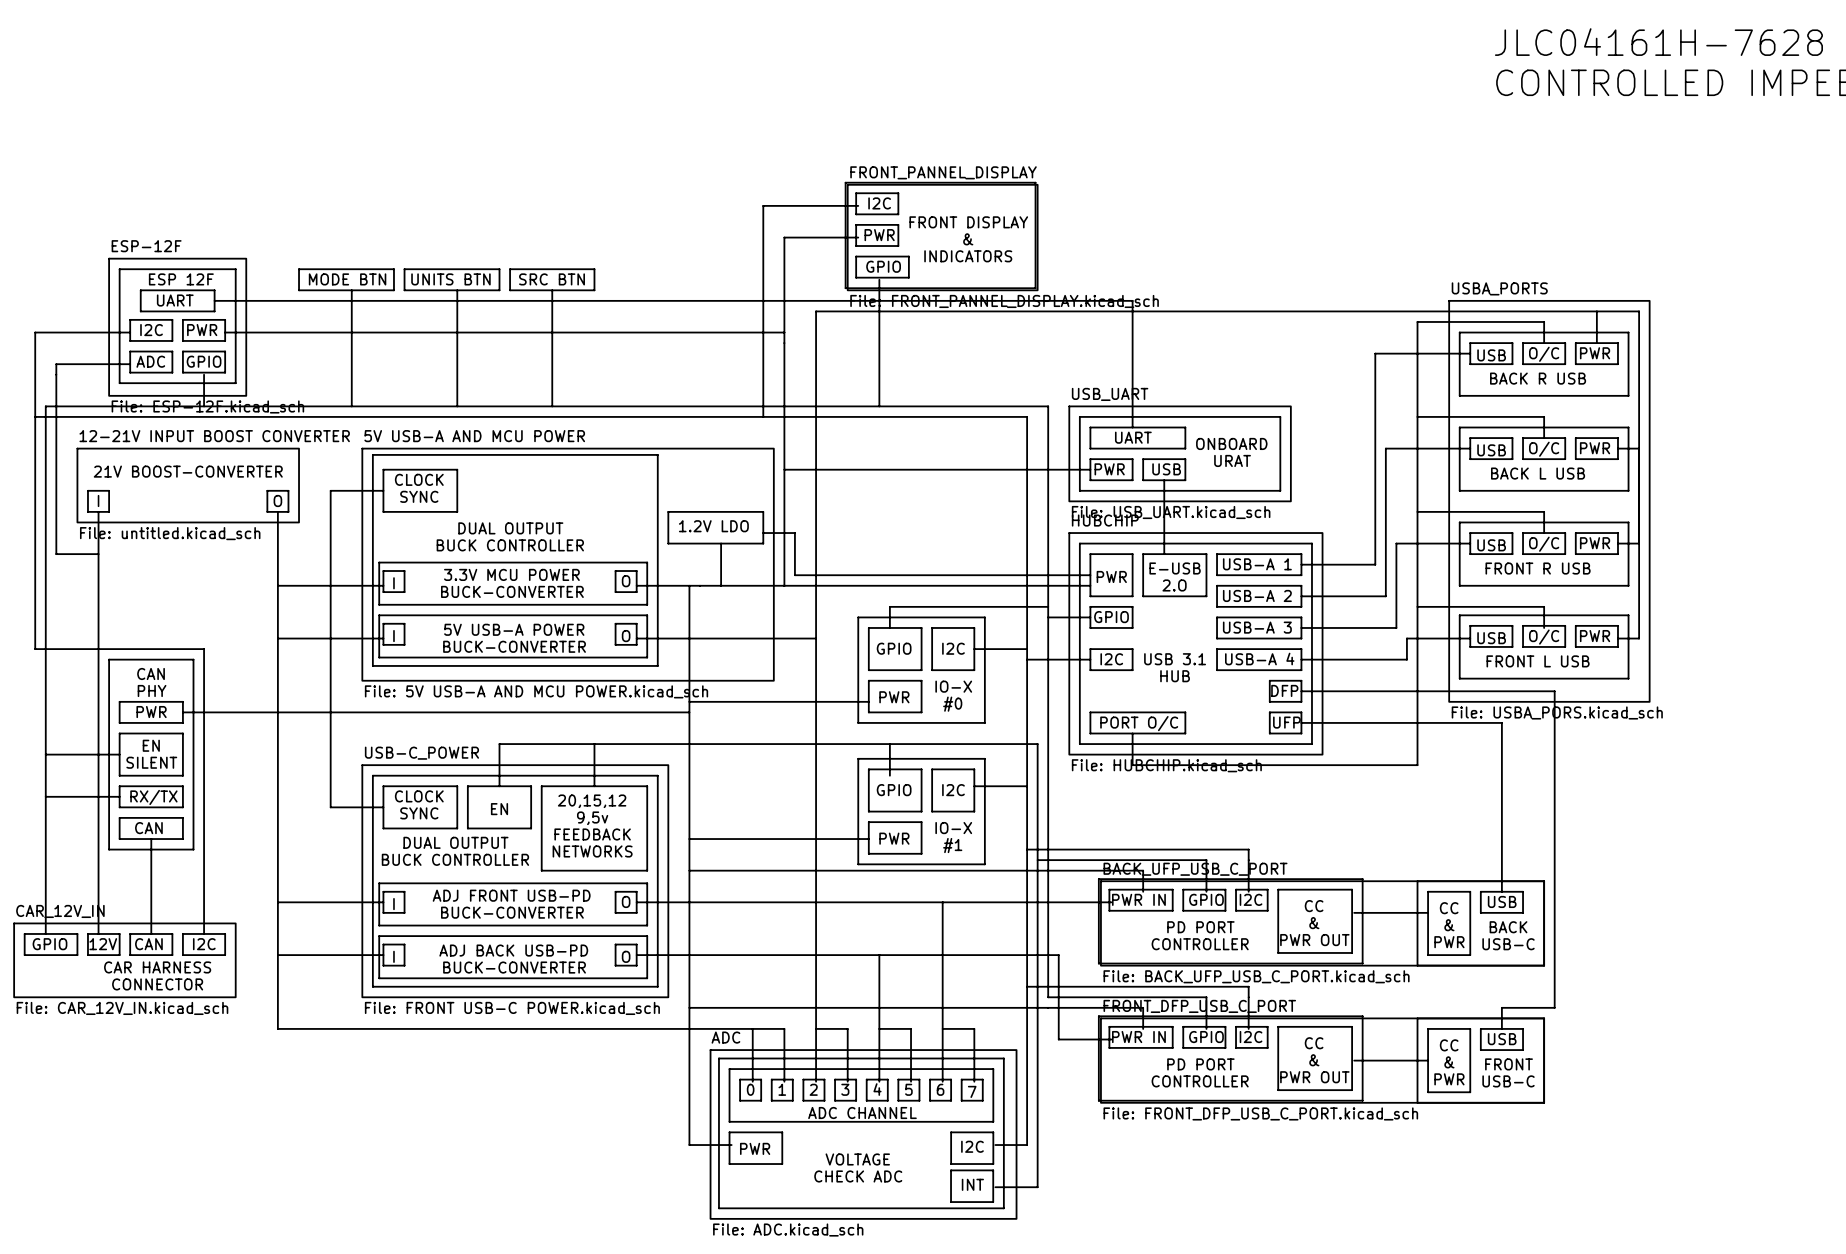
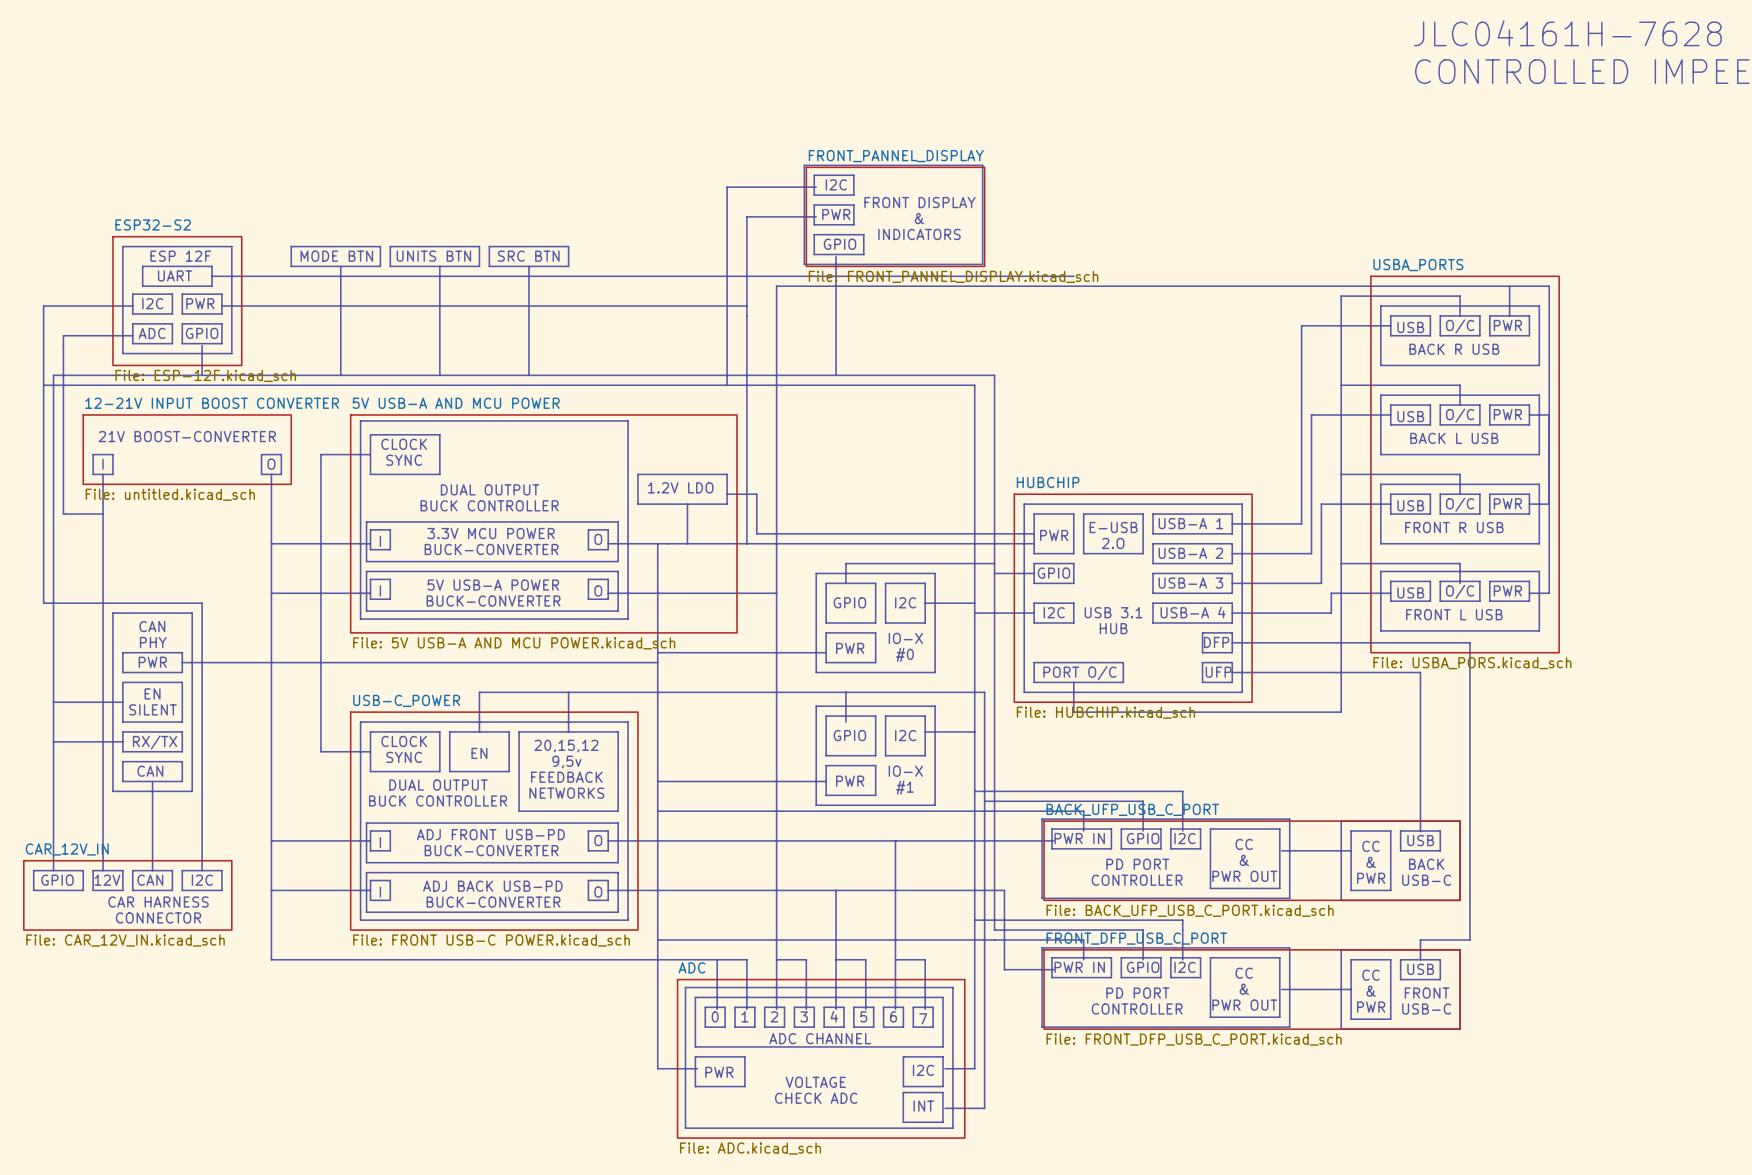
sheet ESP-12F name: ESP-12F (146, 246) -> ESP32-S2 (153, 224)
line: (1132, 300) (1132, 427) -> none
line: (1079, 416) (1280, 416) (1280, 490) (1079, 490) (1079, 416) -> none
line: (1090, 427) (1090, 448) (1185, 448) (1185, 427) (1090, 427) -> none
text: UART (1133, 437) -> none
text: ONBOARD (1231, 443) -> none
sheet USB_UART: File: USB_UART.kicad_sch (1180, 453) -> none
line: (1090, 459) (1132, 459) (1132, 480) (1090, 480) (1090, 459) -> none
line: (1143, 459) (1185, 459) (1185, 480) (1143, 480) (1143, 459) -> none
text: URAT (1232, 460) -> none
line: (784, 469) (1090, 469) -> none
text: PWR (1109, 469) -> none
text: USB (1166, 469) -> none
line: (1164, 480) (1164, 554) -> none

